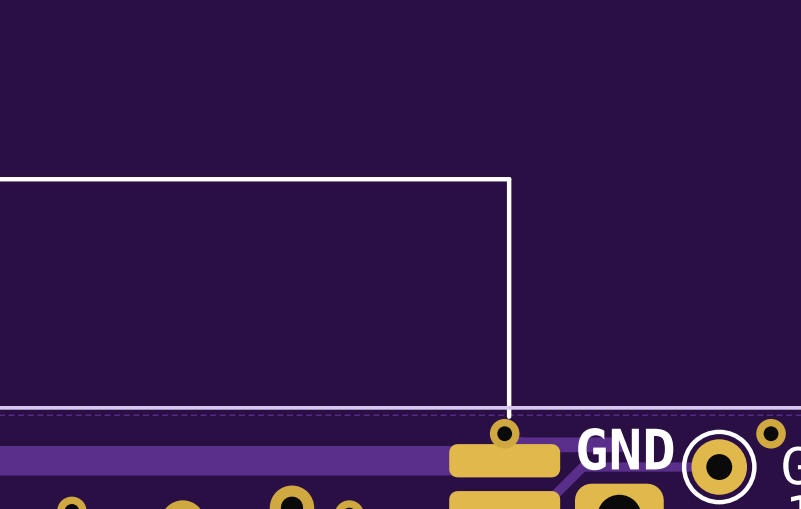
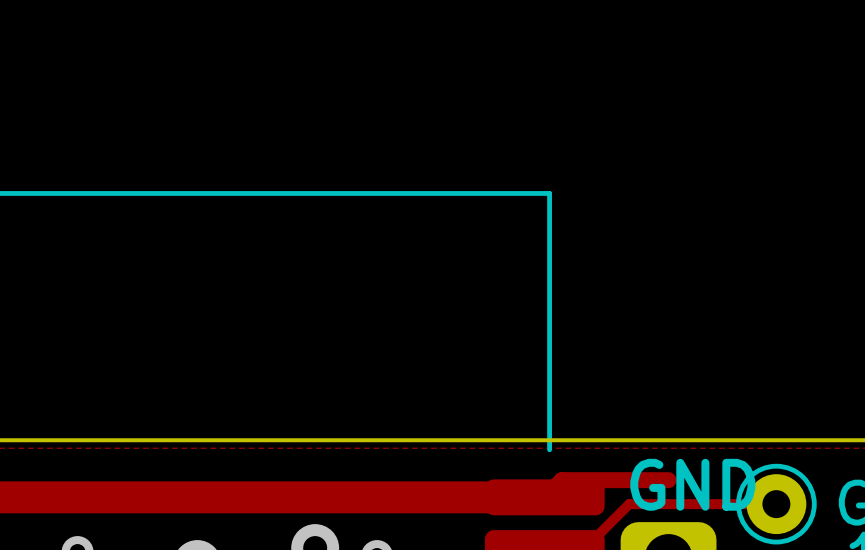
via: (504, 433) -> none
via: (771, 433) -> none

